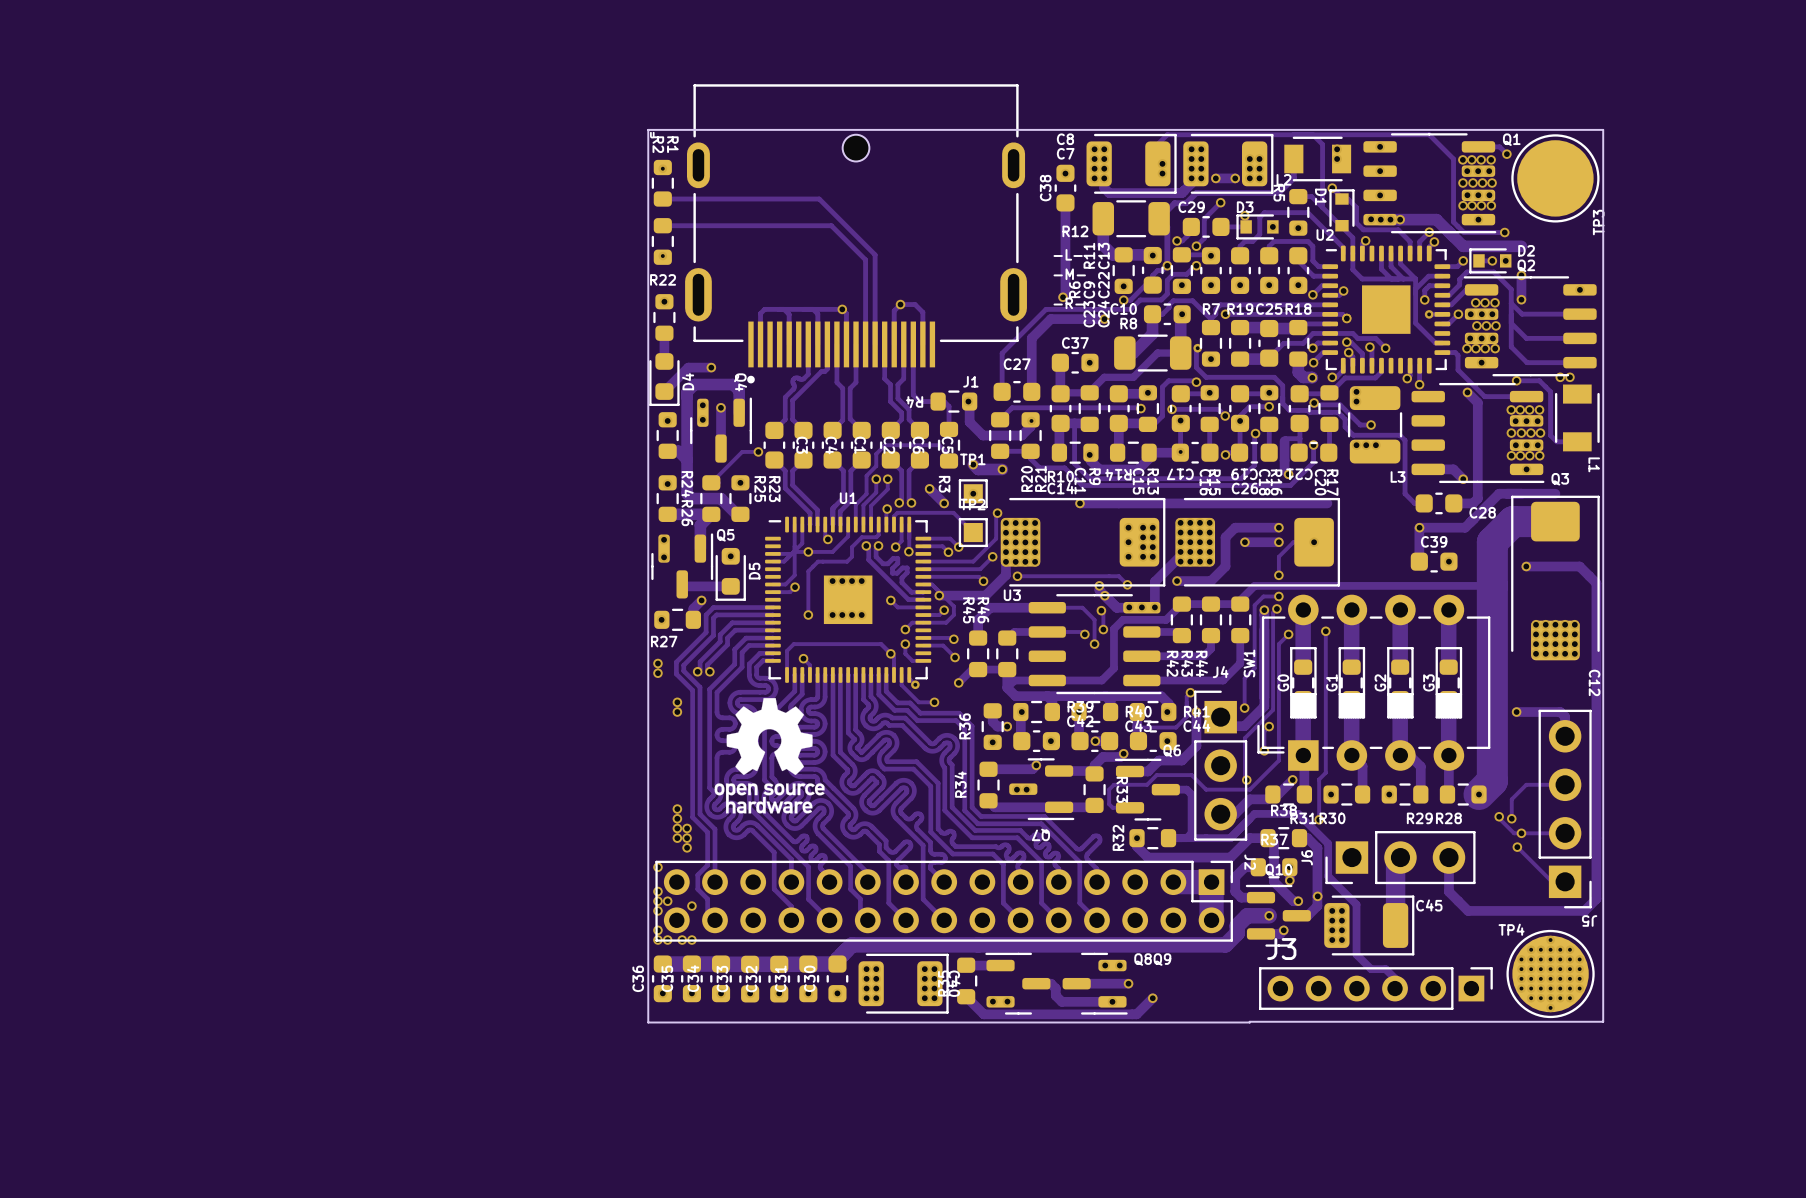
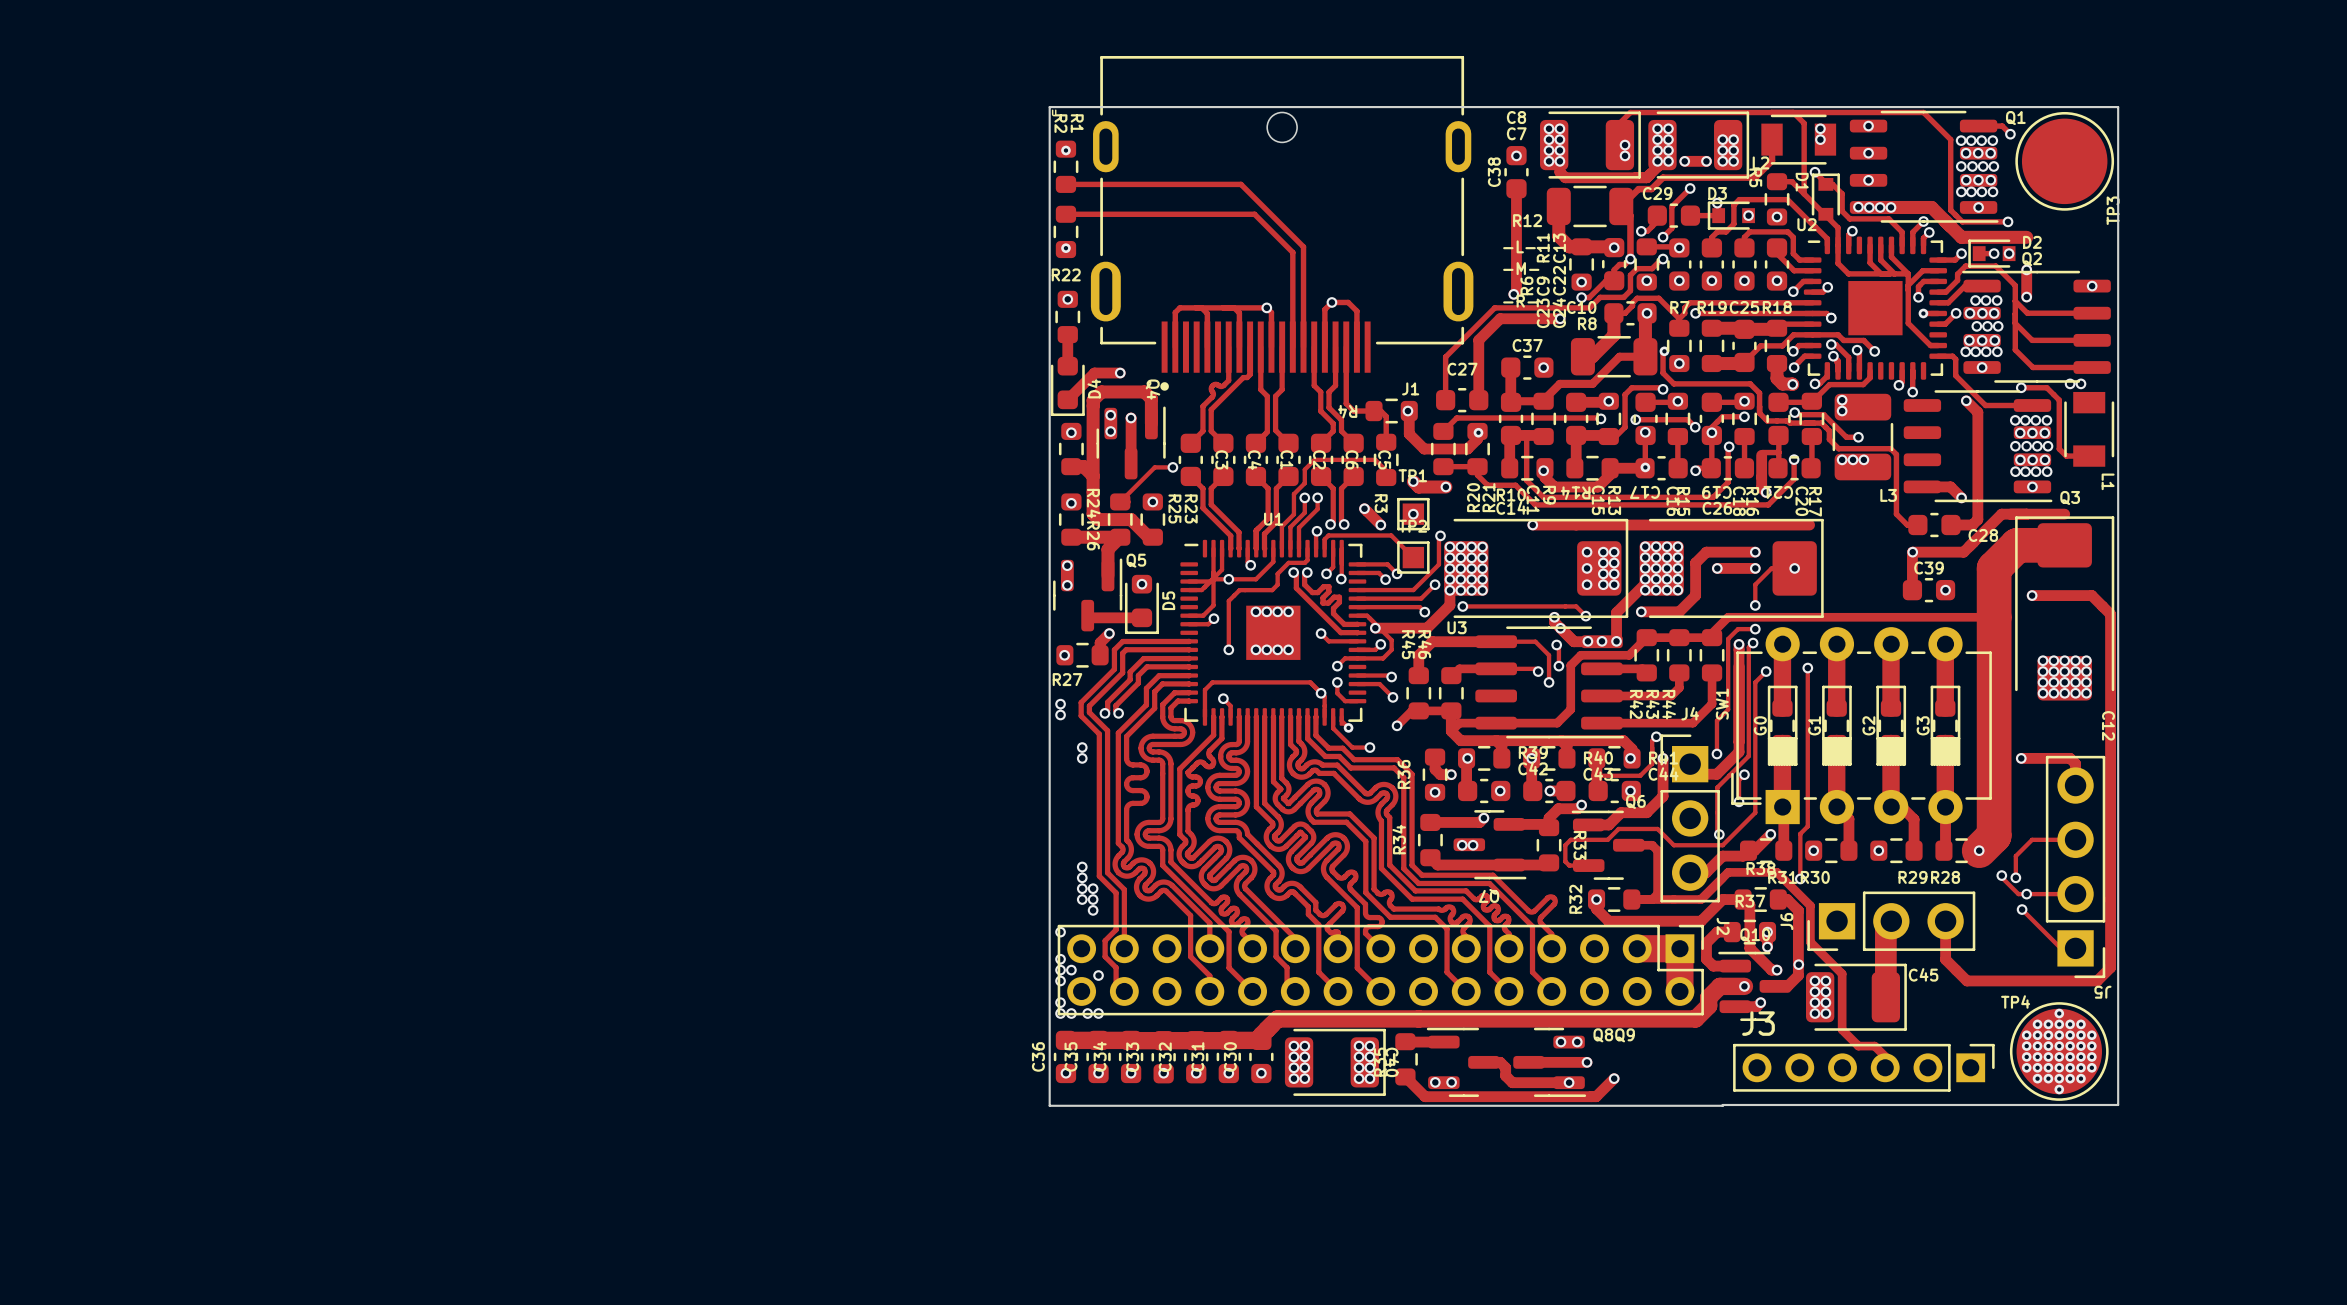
drawing: [714, 698, 825, 814] -> none

